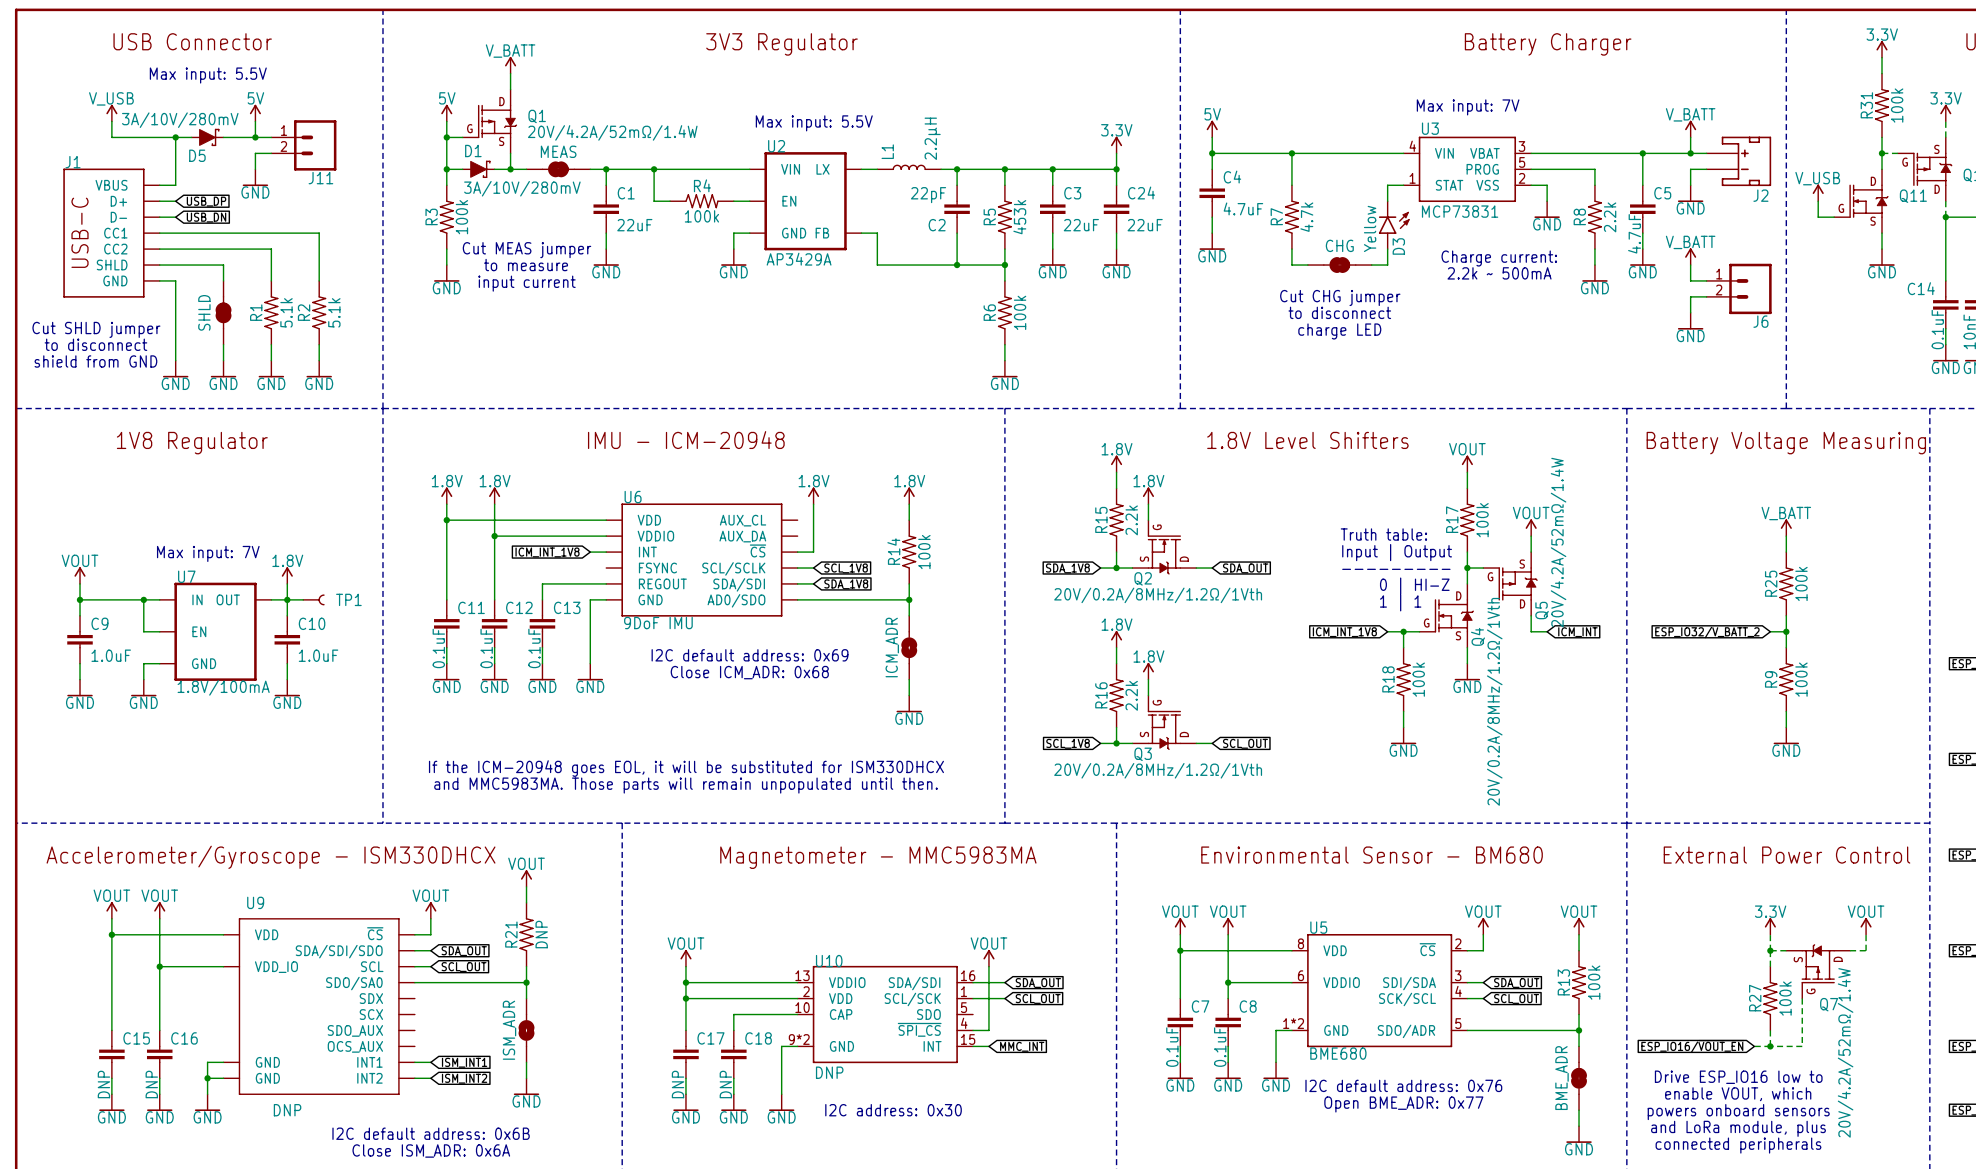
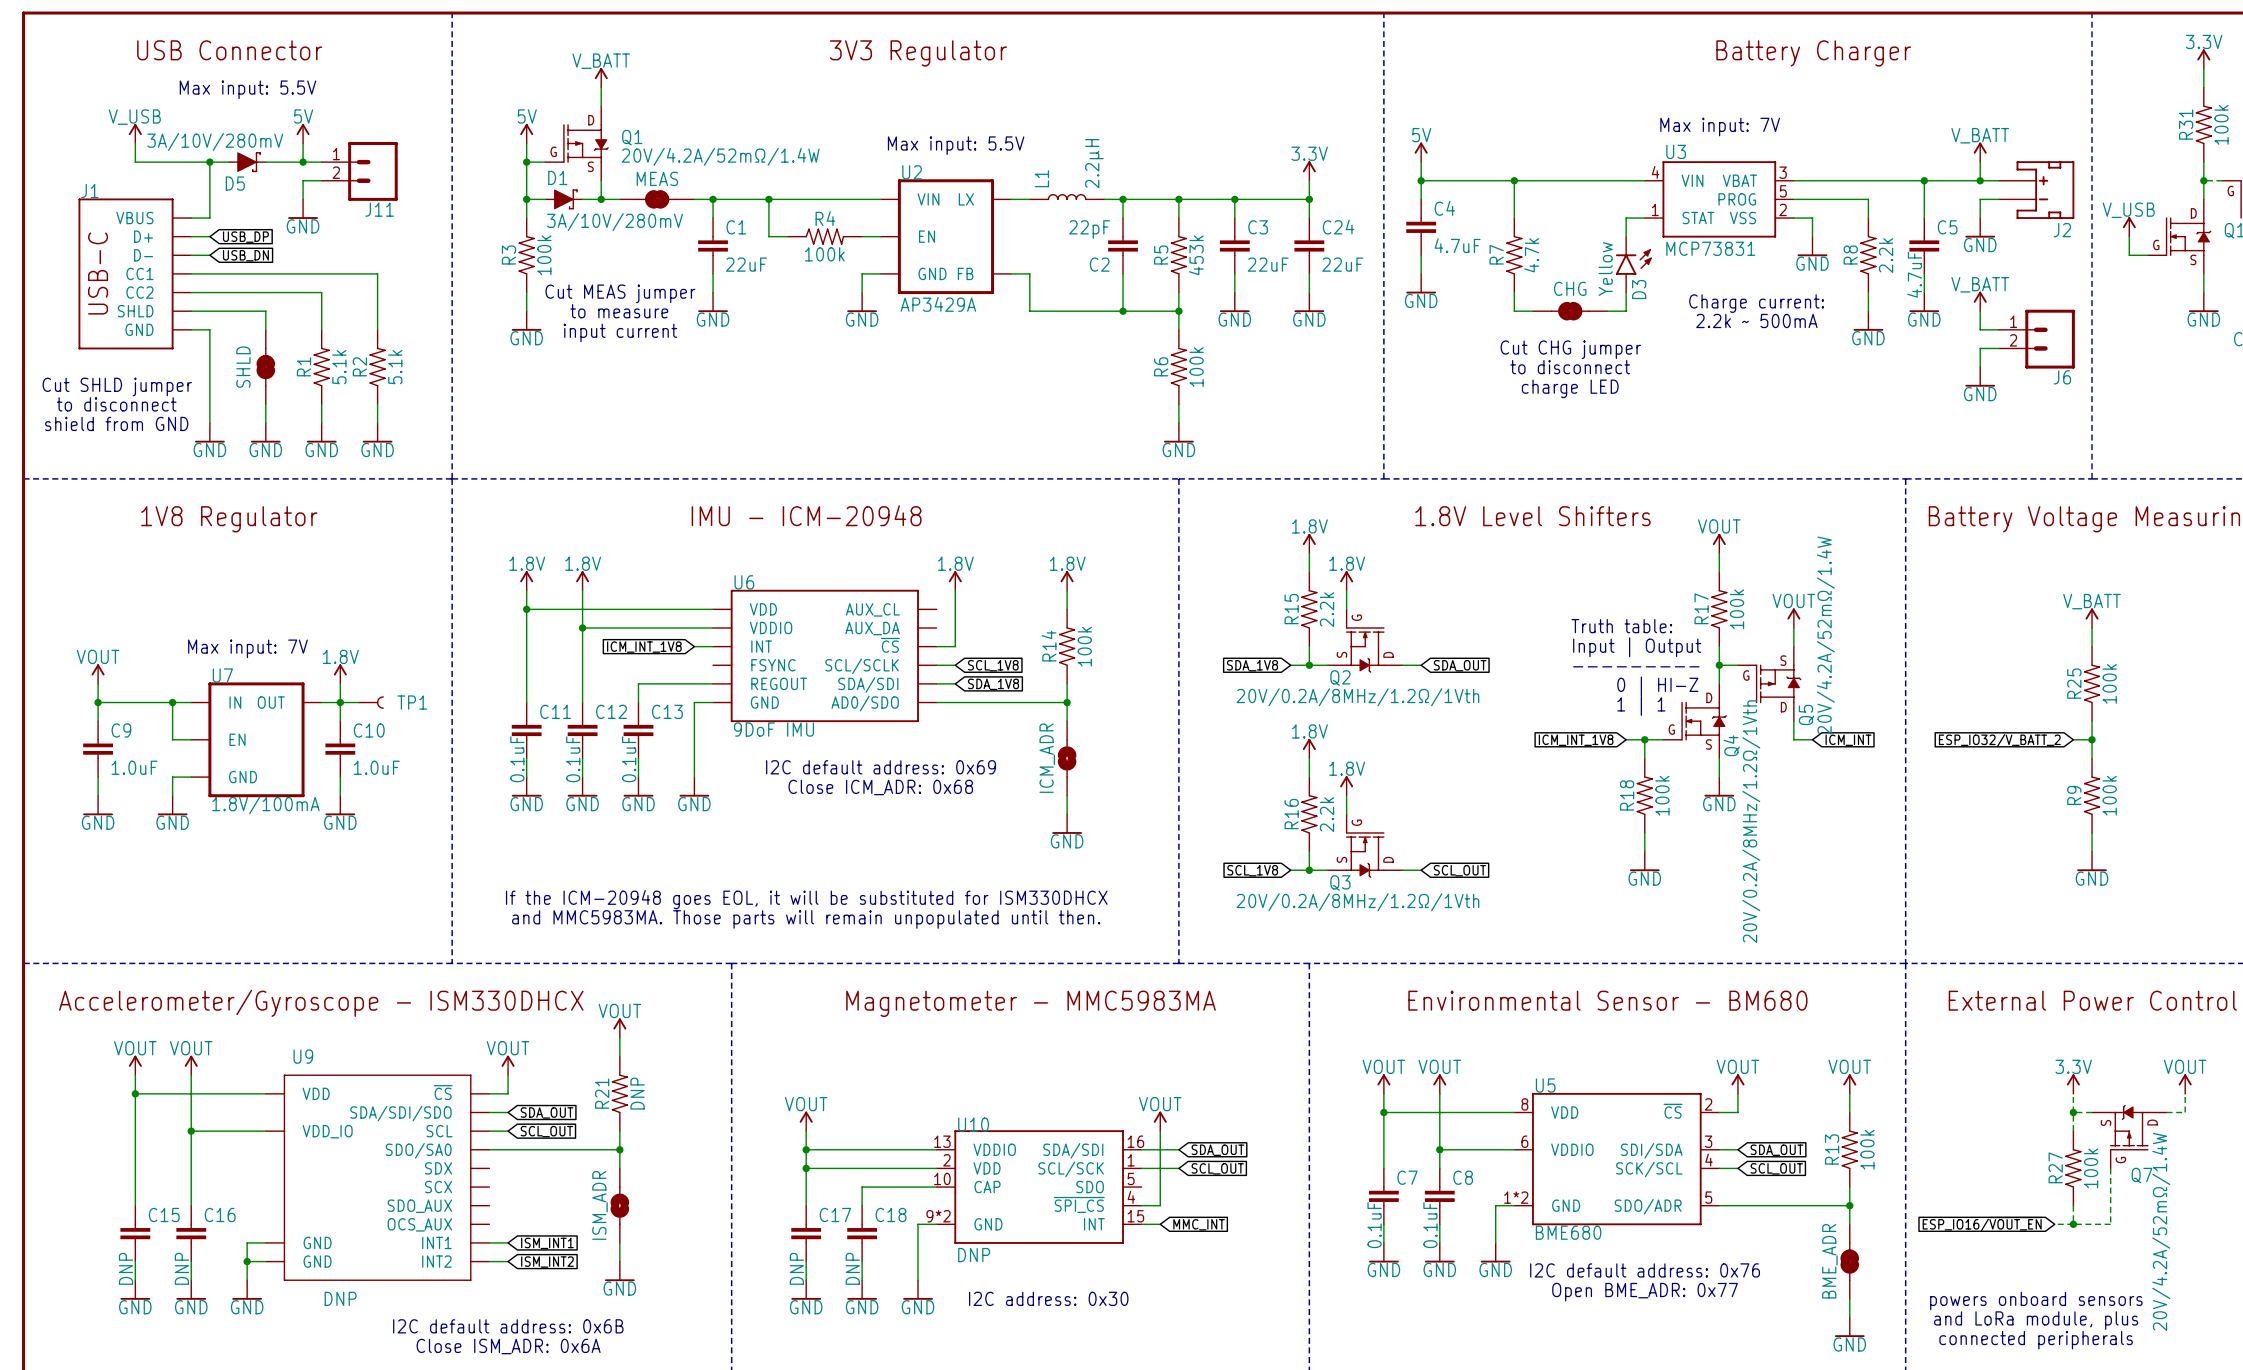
text: Drive ESP_IO16 low to (1738, 1077) -> none
text: enable VOUT, which (1738, 1094) -> none

